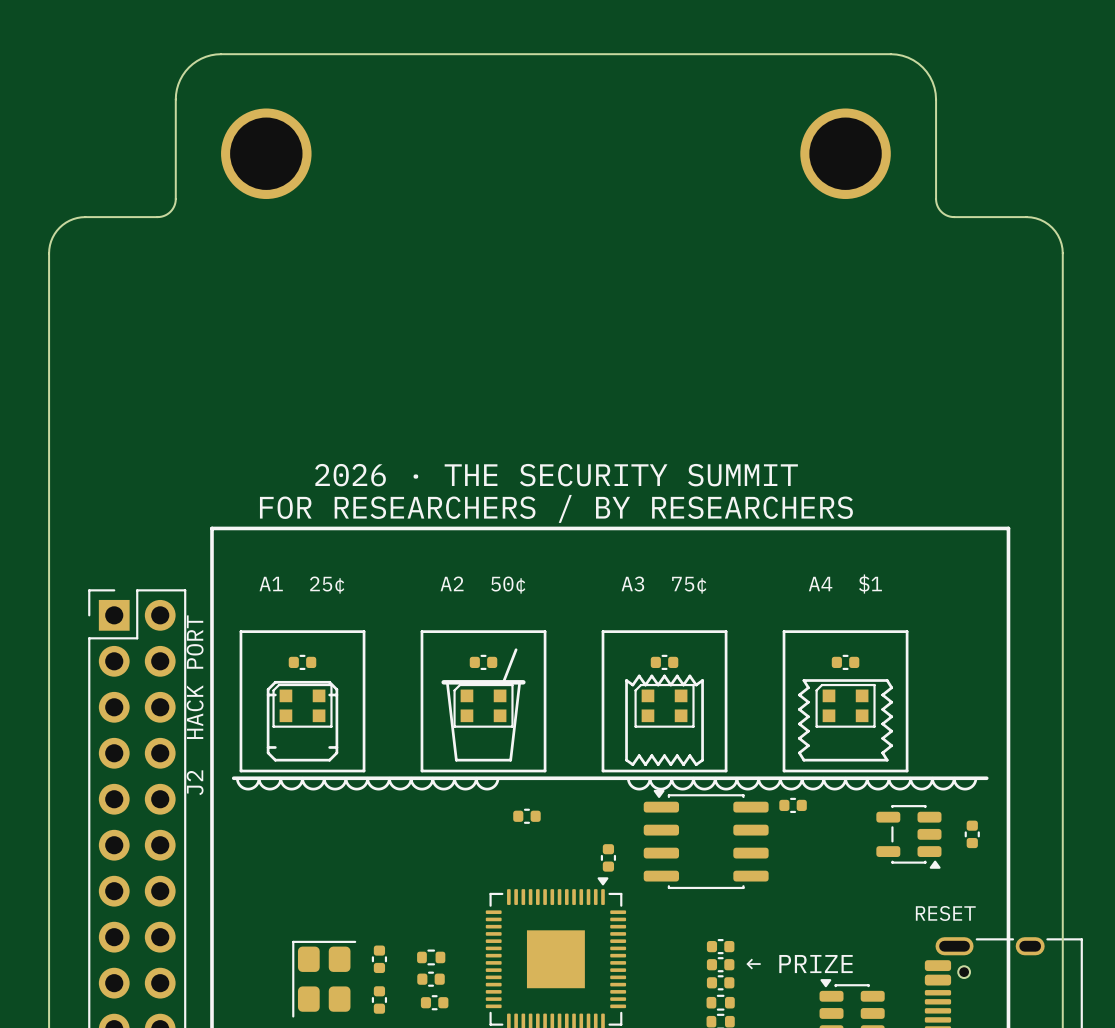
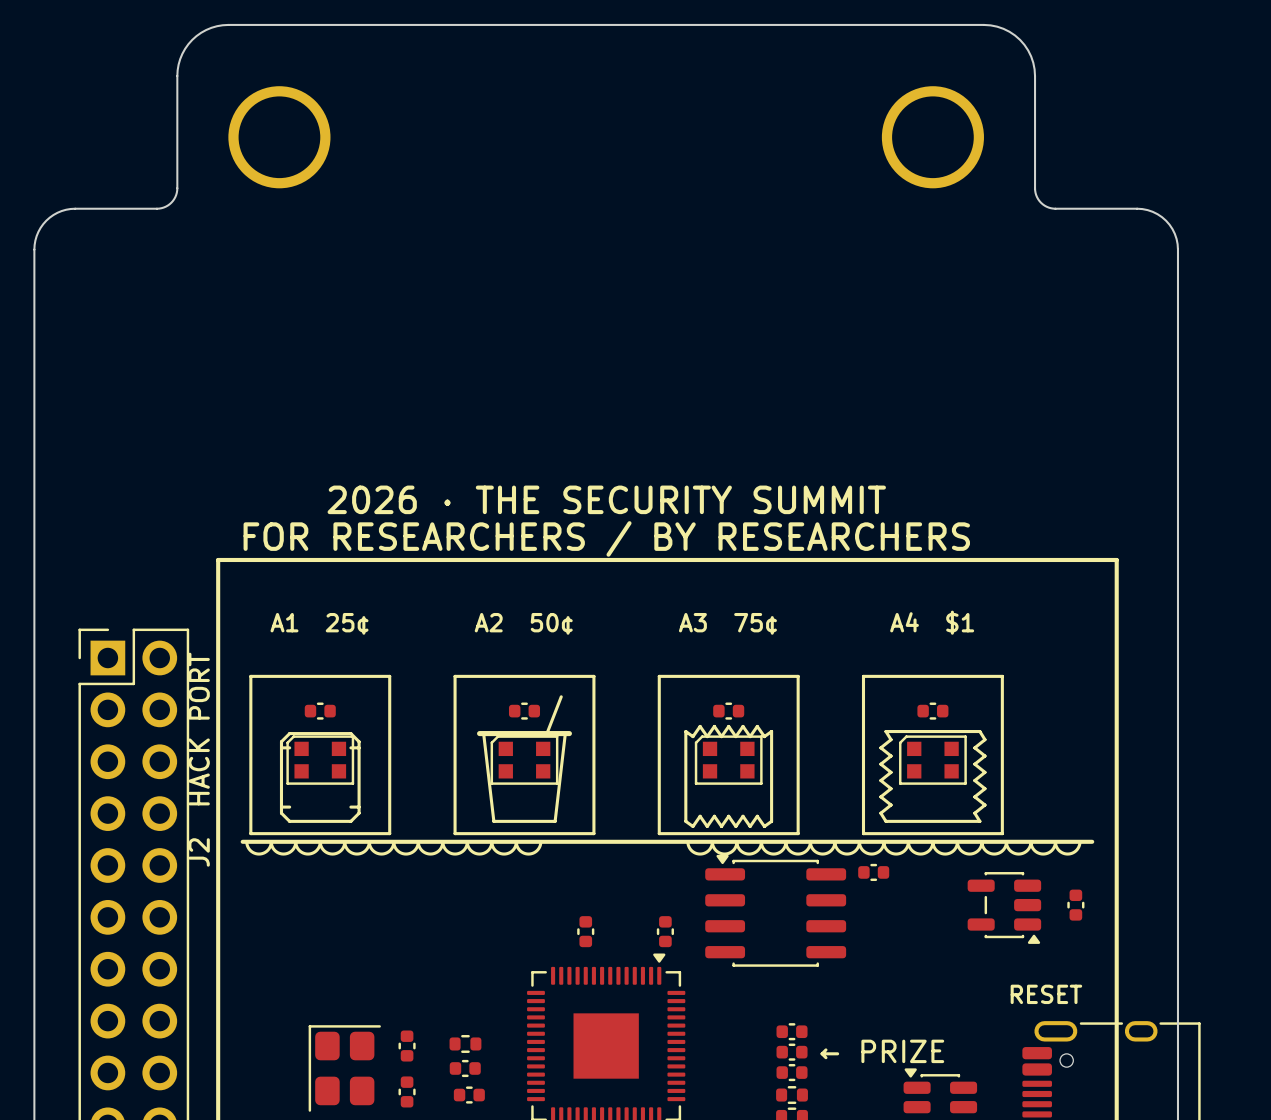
part rotation: 0° (526, 816) -> 90° clockwise (585, 931)
part position: (526, 816) -> (585, 931)

